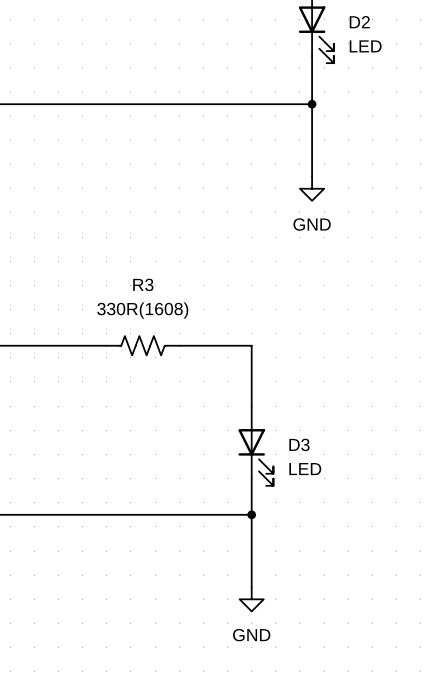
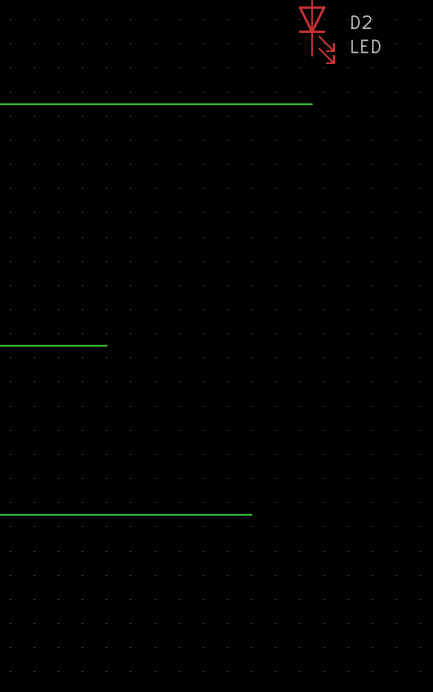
wire: (312, 55) (312, 176) -> none
junction: (312, 104) -> none
power symbol: GND (312, 188) -> none
R3: 330R(1608) (143, 345) -> none
wire: (179, 345) (251, 345) (251, 406) -> none
D3: LED (255, 445) -> none
wire: (251, 478) (251, 587) -> none
junction: (251, 514) -> none
power symbol: GND (251, 599) -> none

